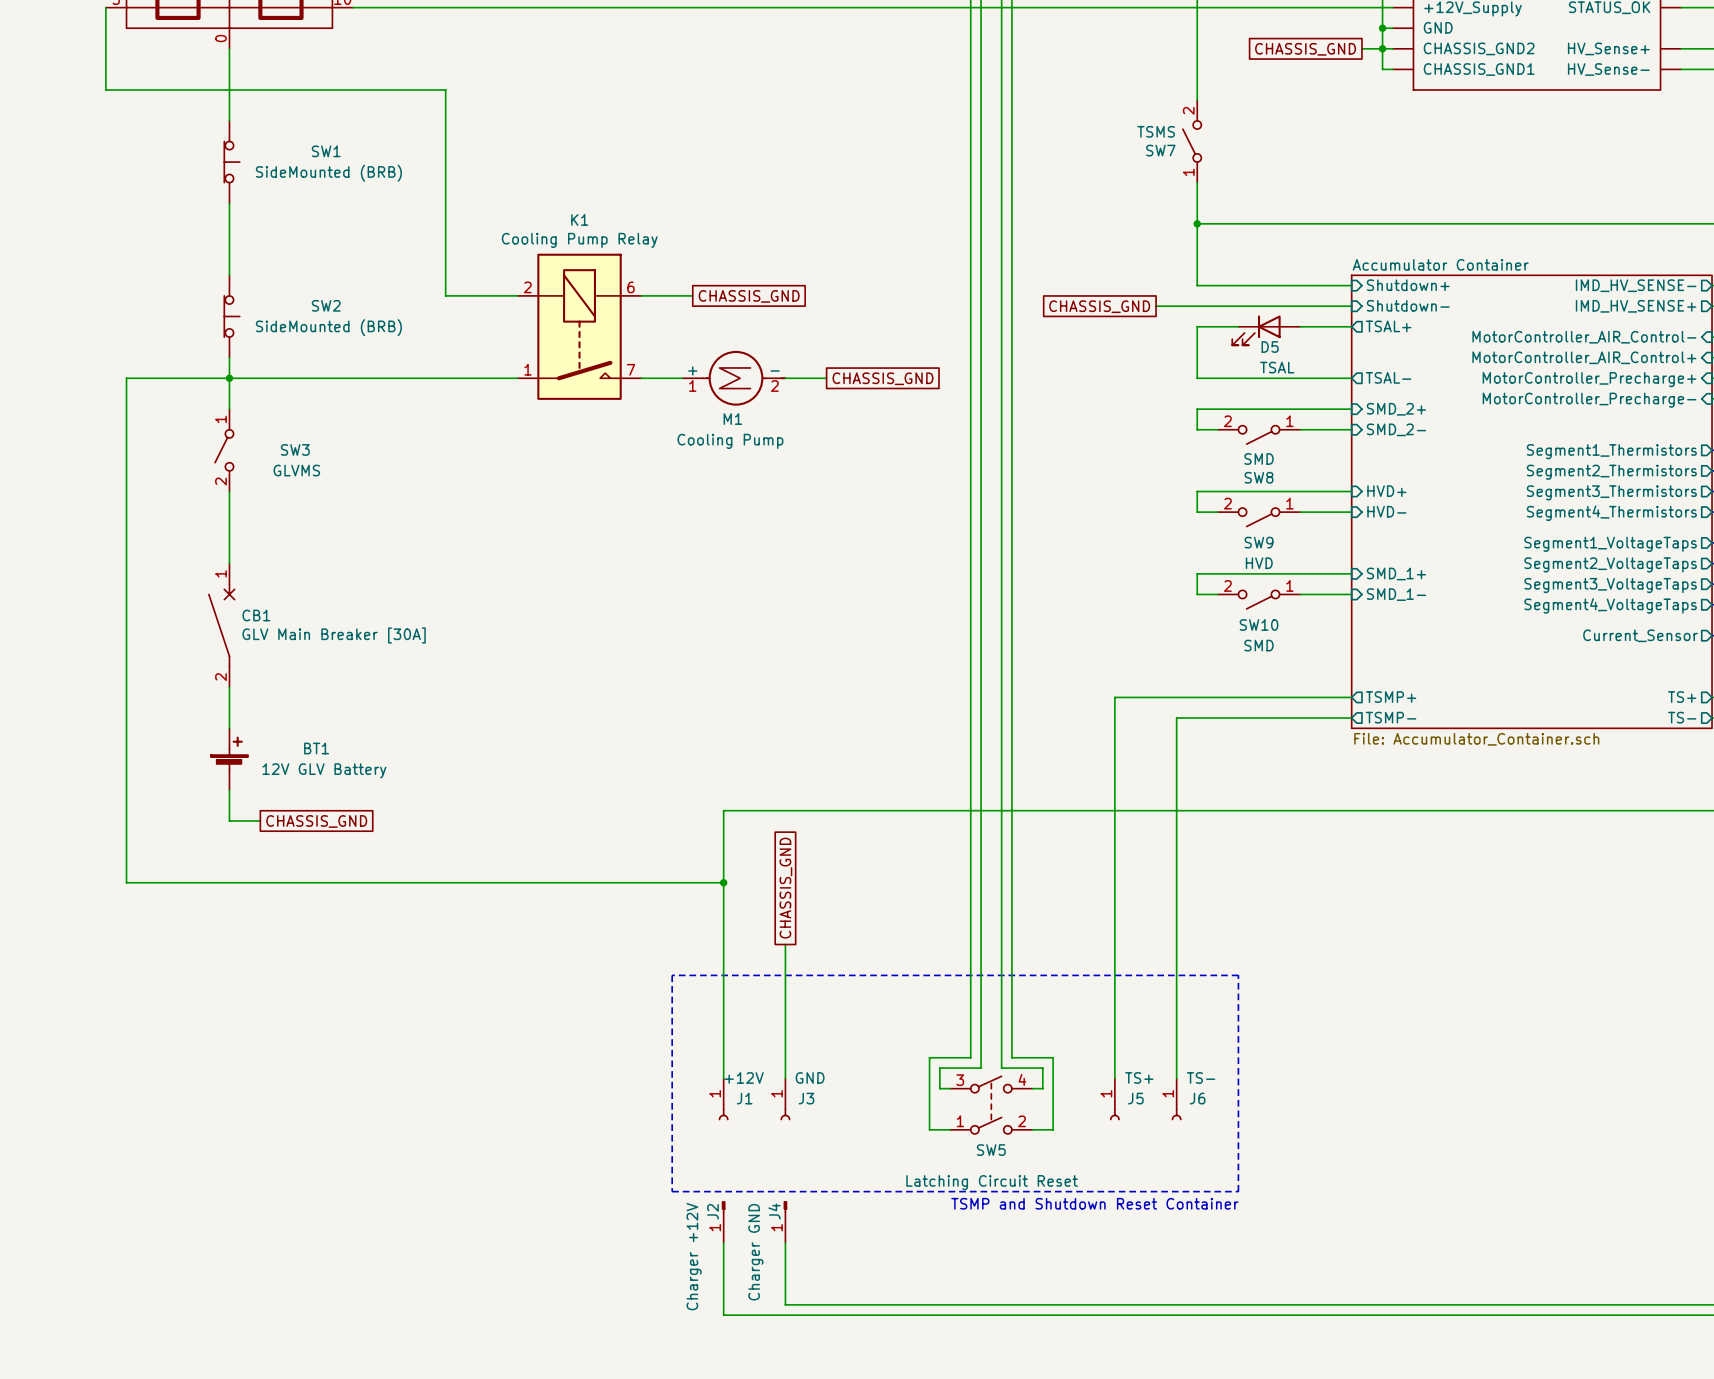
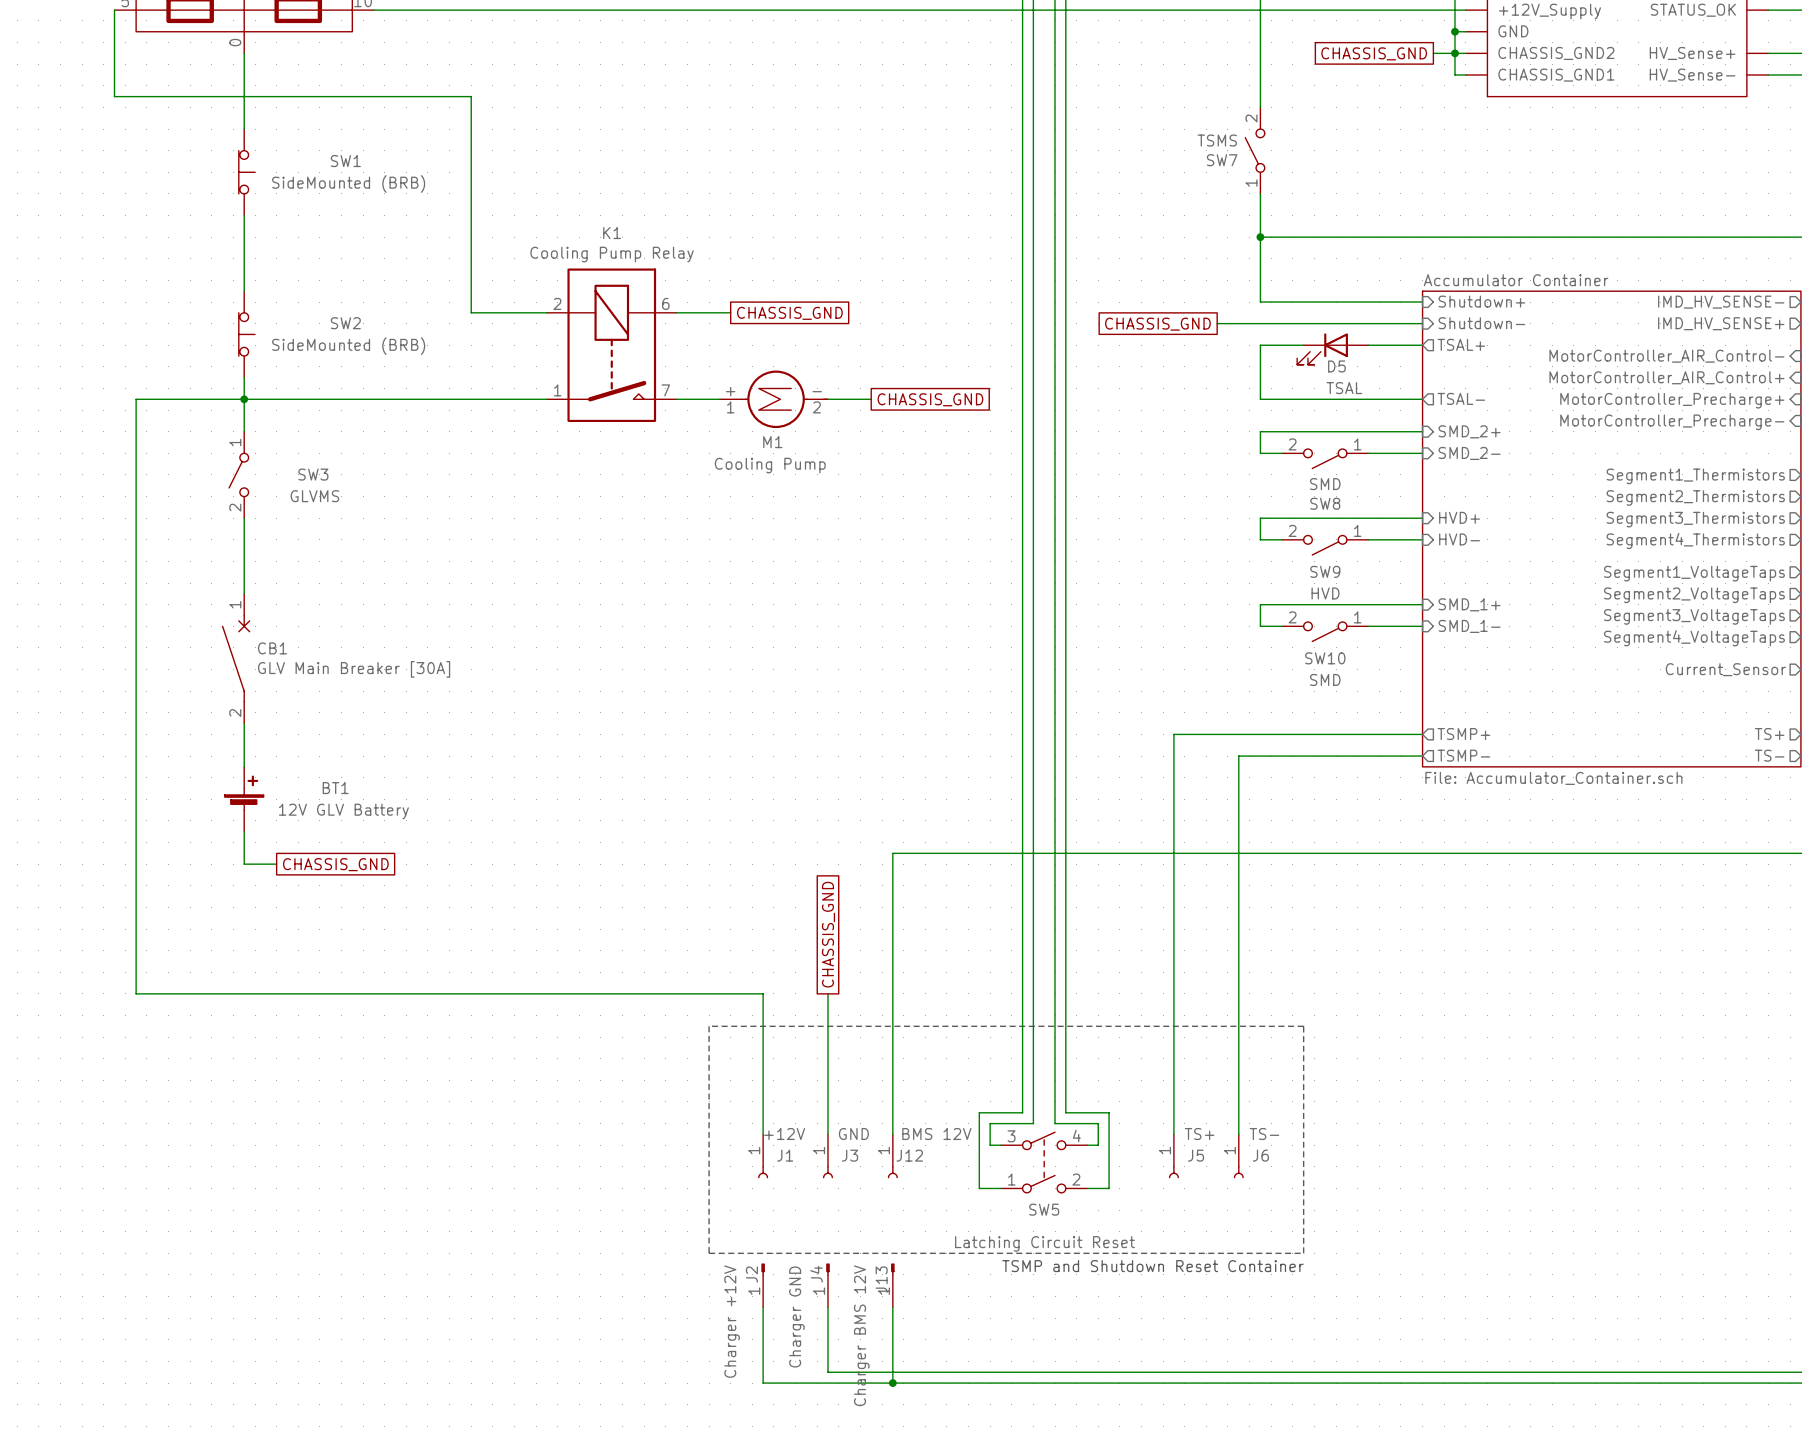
wire: (847, 810) (723, 810) (723, 944) -> (892, 853) (892, 1134)
wire: (126, 882) (723, 882) -> (136, 929) (136, 993) (763, 993)
junction: (723, 882) -> none
J12: none -> BMS 12V (892, 1156)
J13: none -> Charger BMS 12V (892, 1285)
wire: none -> (892, 1307) (892, 1383)
junction: none -> (892, 1383)

